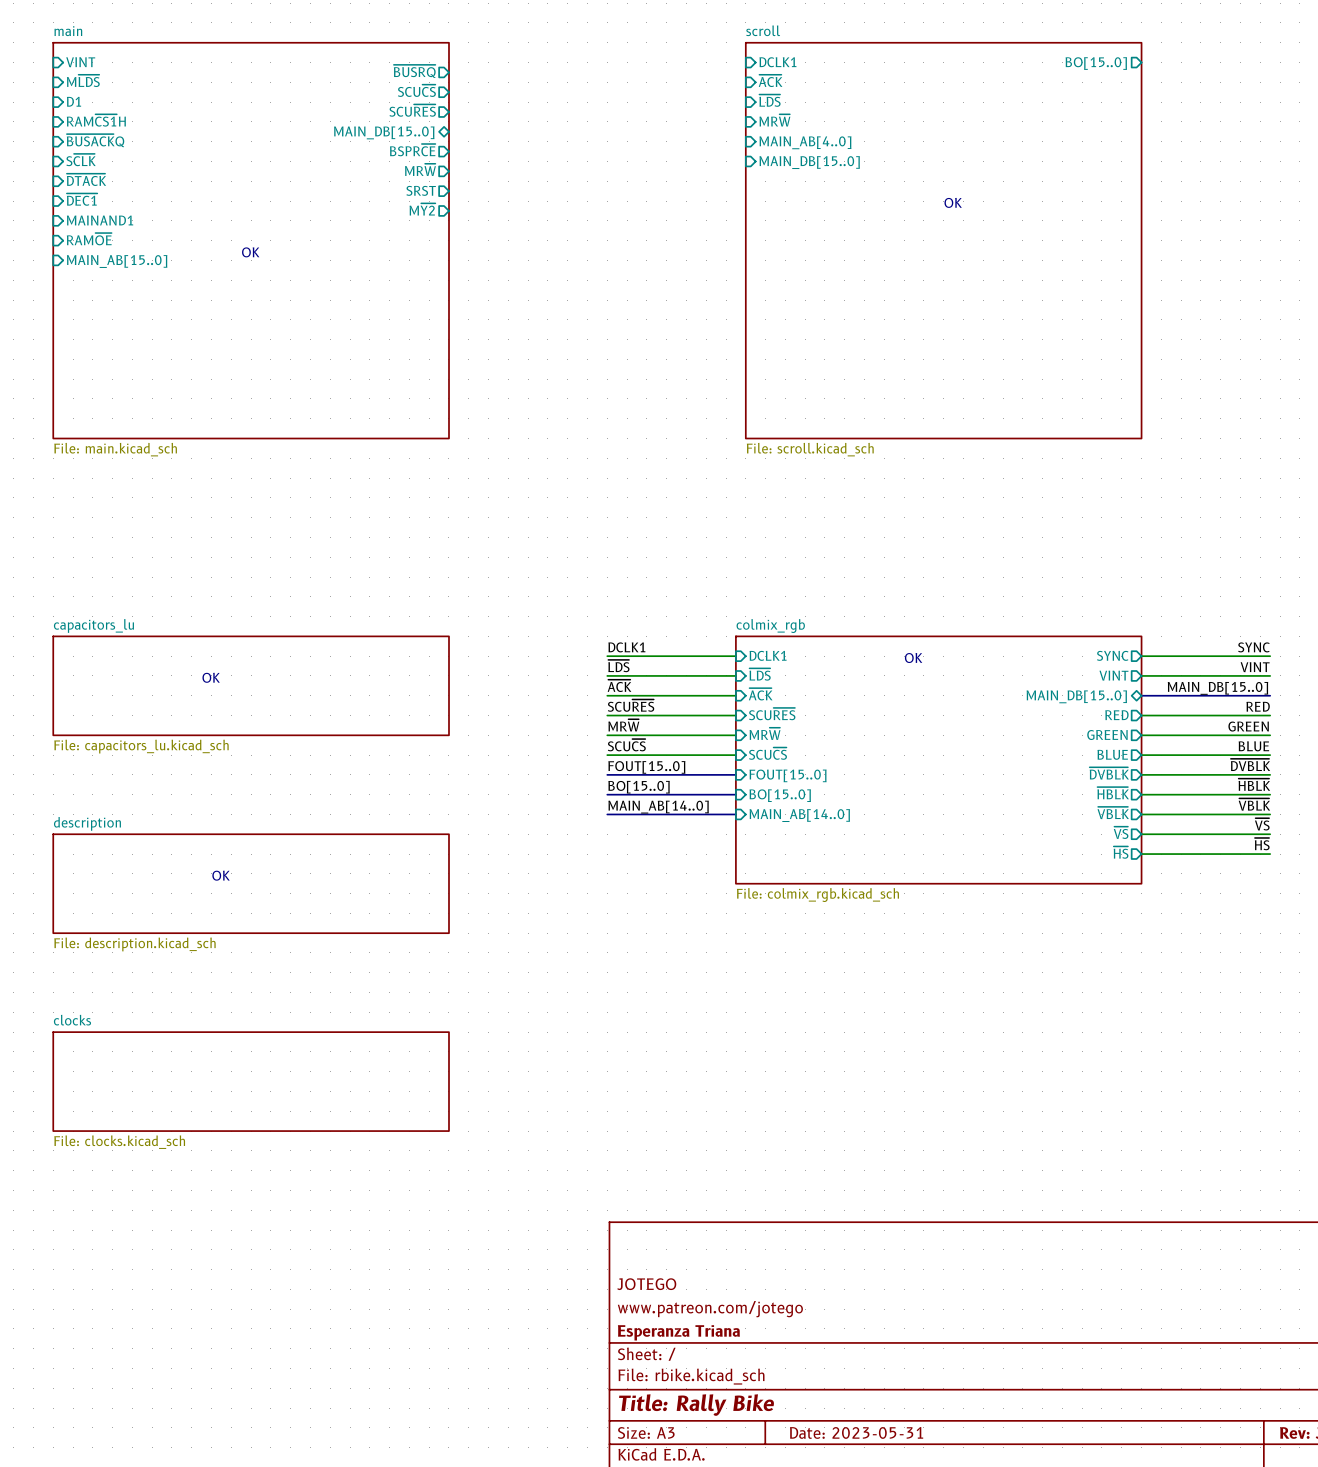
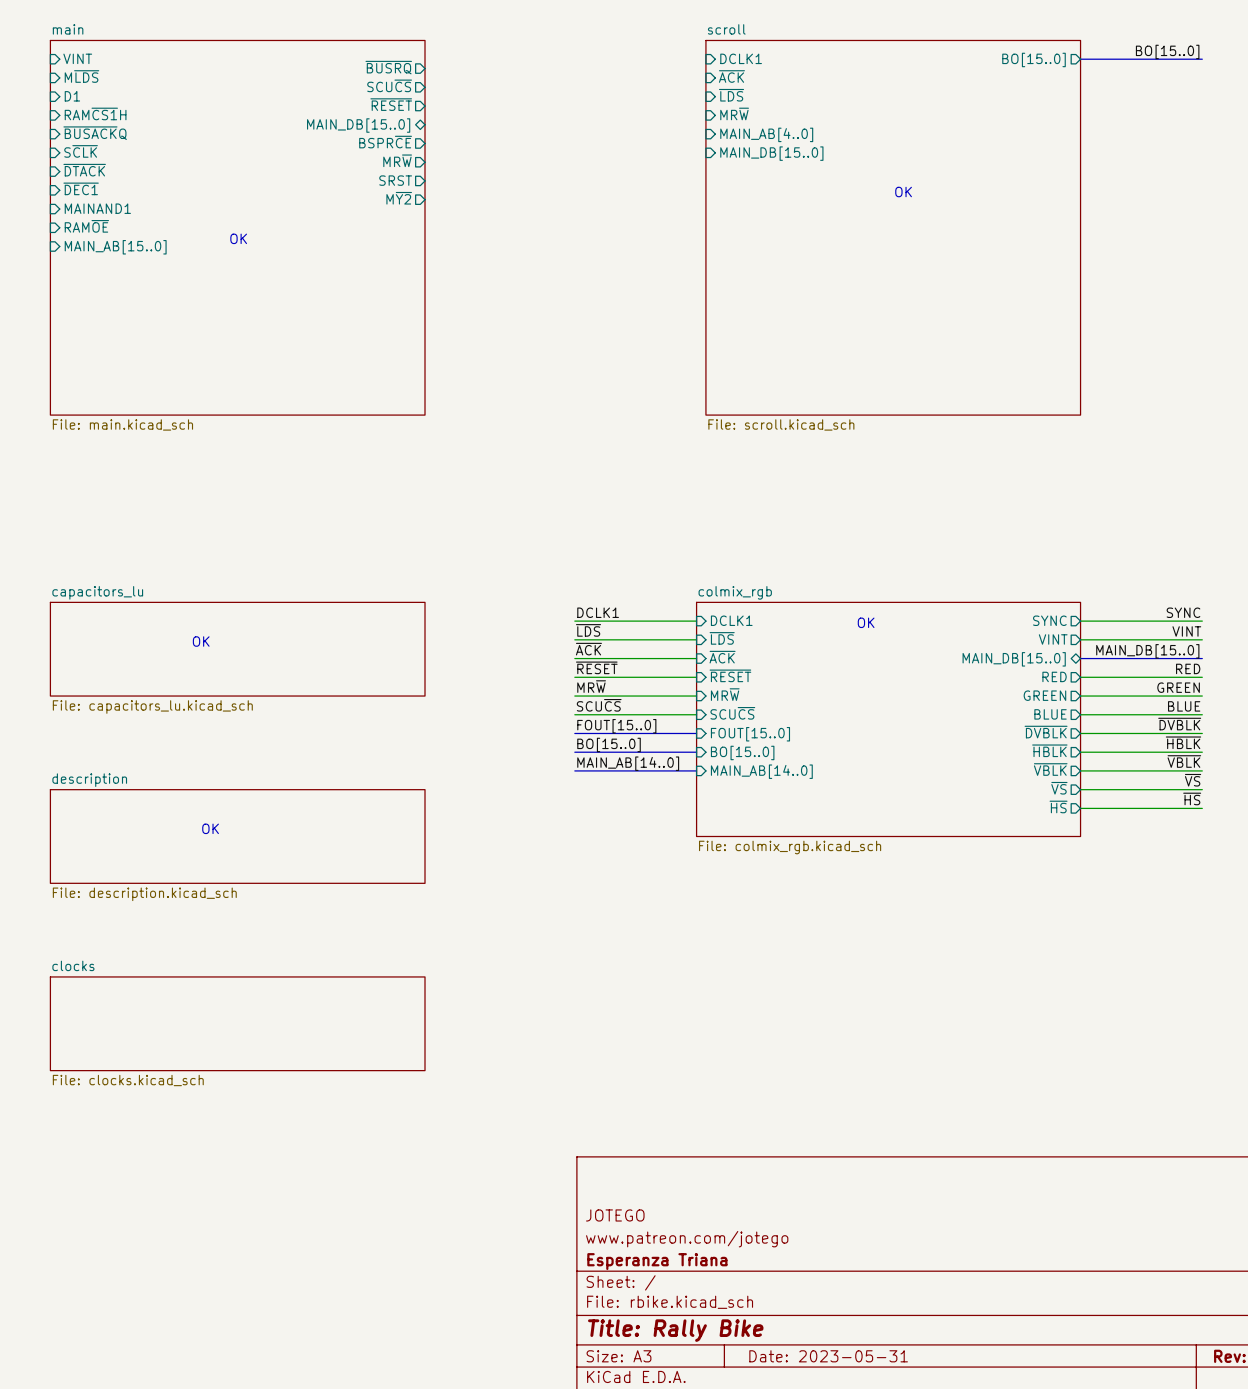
label: none -> BO[15..0] (1167, 51)
bus: none -> (1080, 59) (1202, 59)
sheet pin: SCU~{RES} (412, 110) -> ~{RESET} (391, 104)
label: SCU~{RES} (631, 705) -> ~{RESET} (596, 667)
sheet pin: SCU~{RES} (772, 714) -> ~{RESET} (730, 675)

